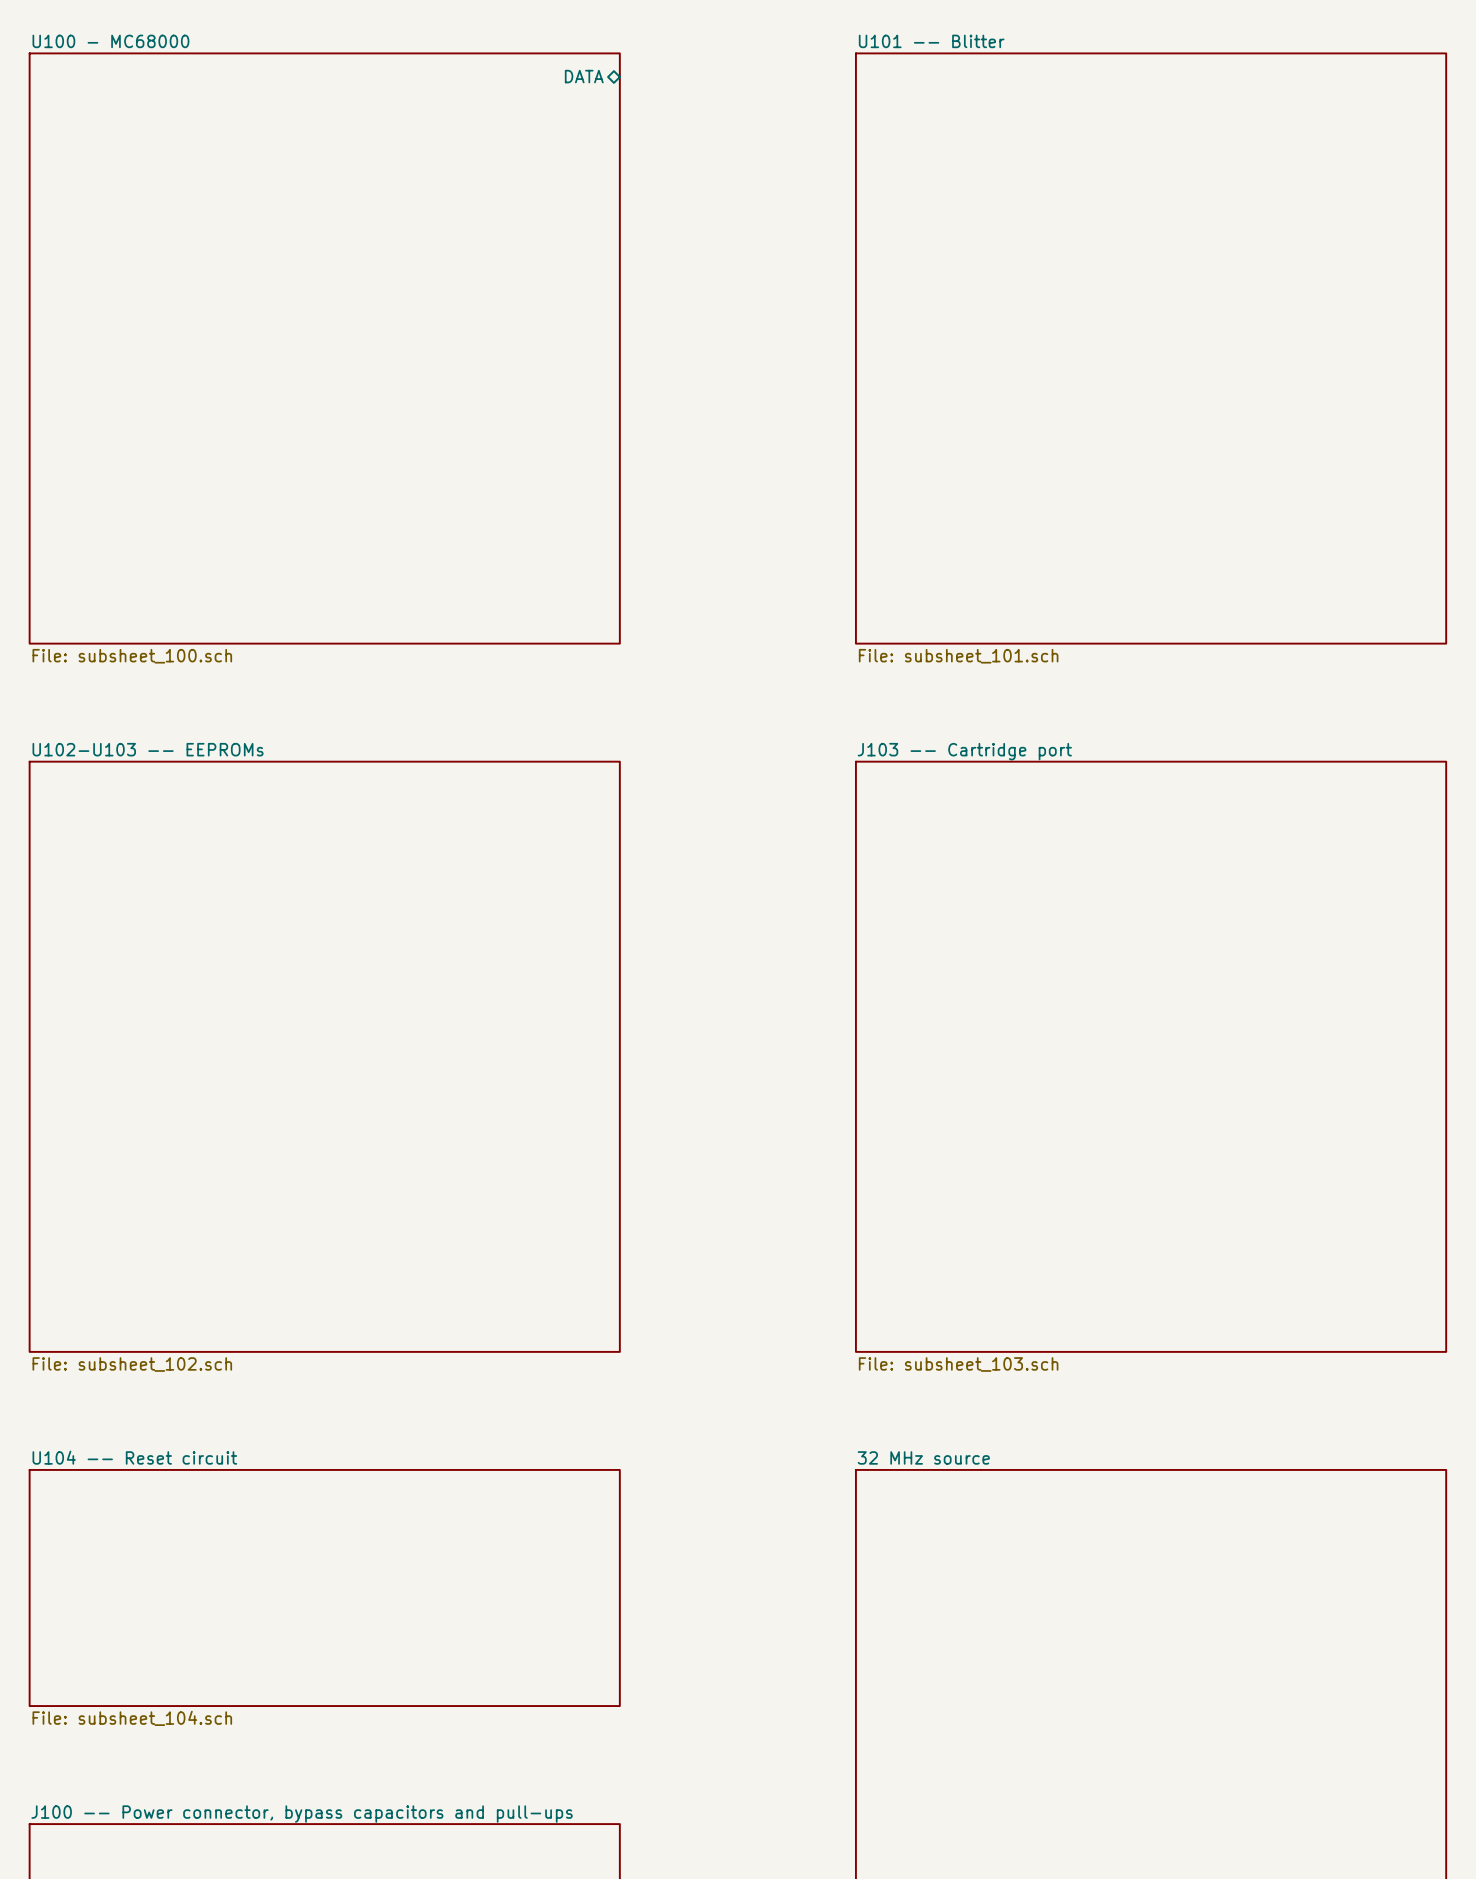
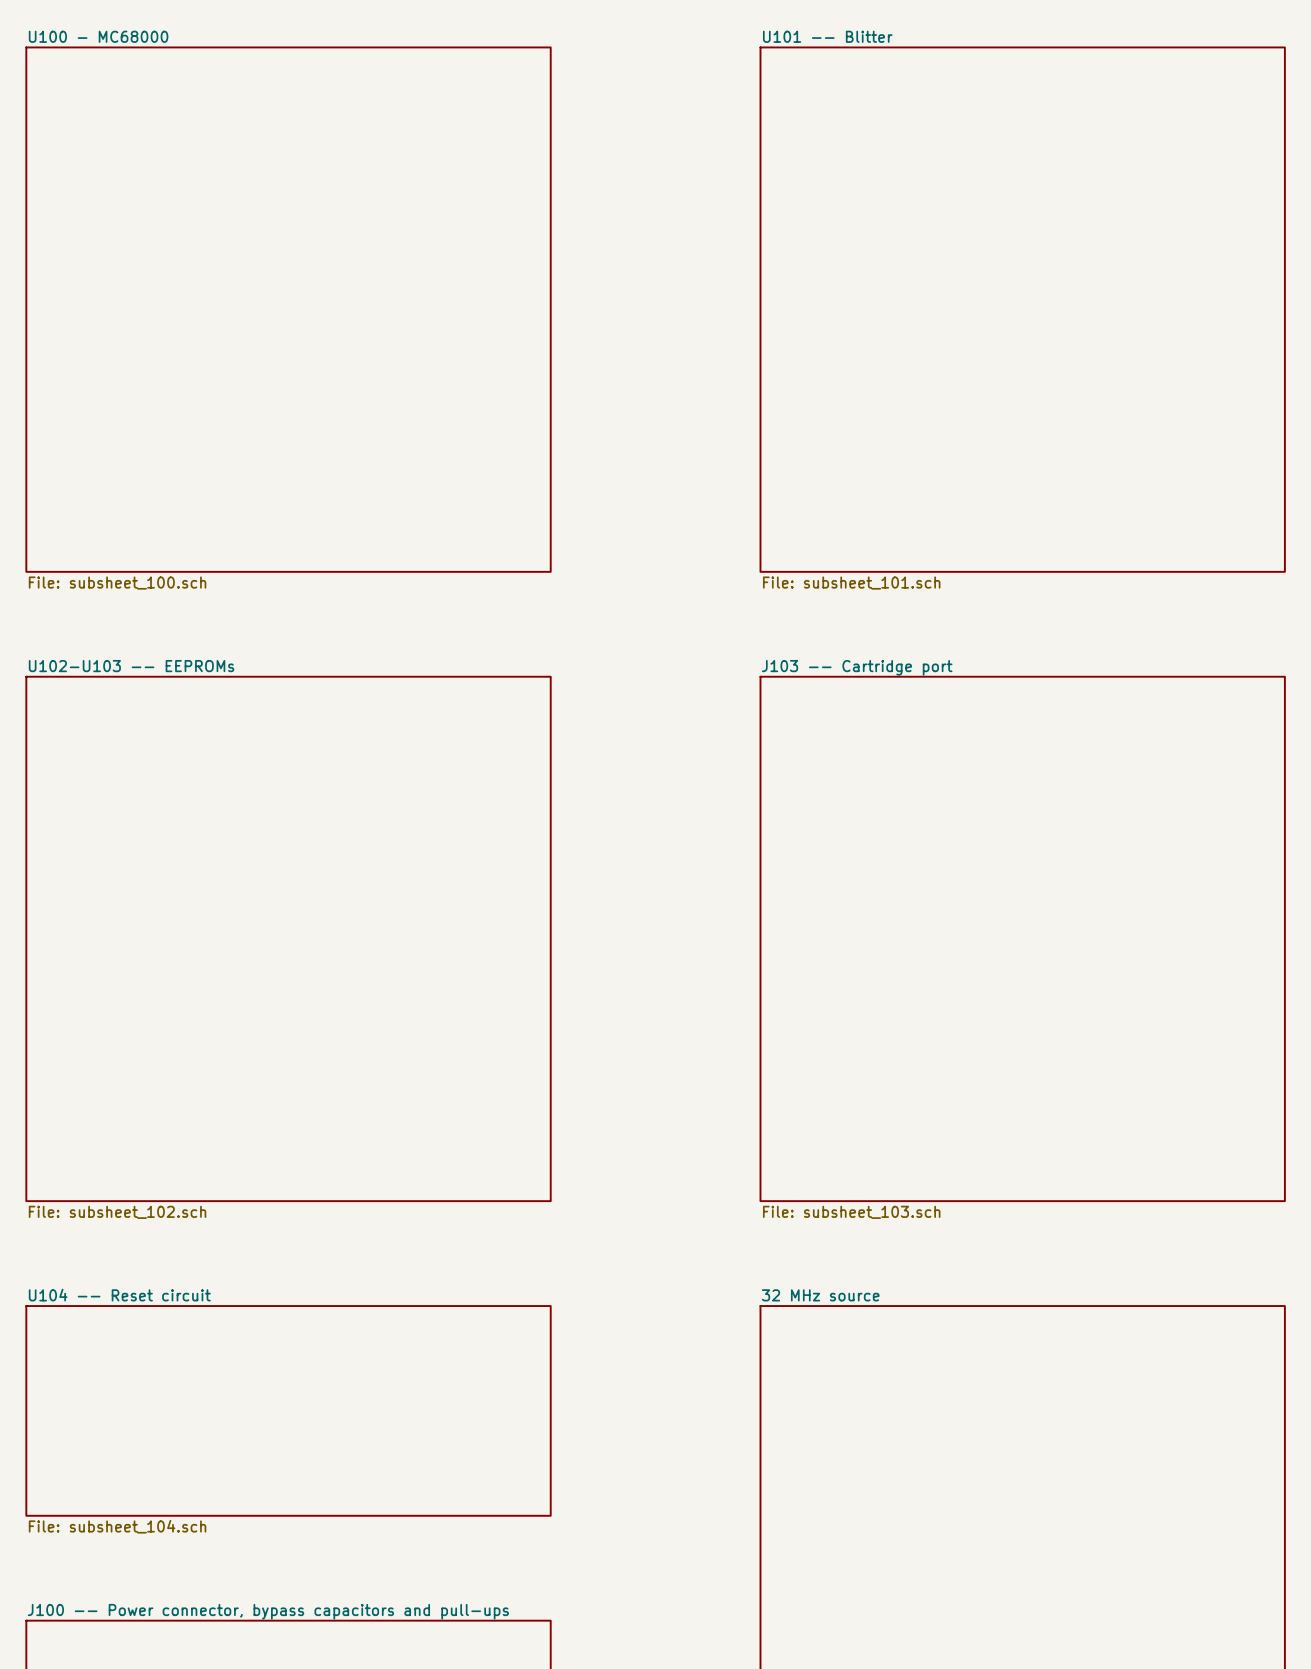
sheet pin: DATA (584, 76) -> none

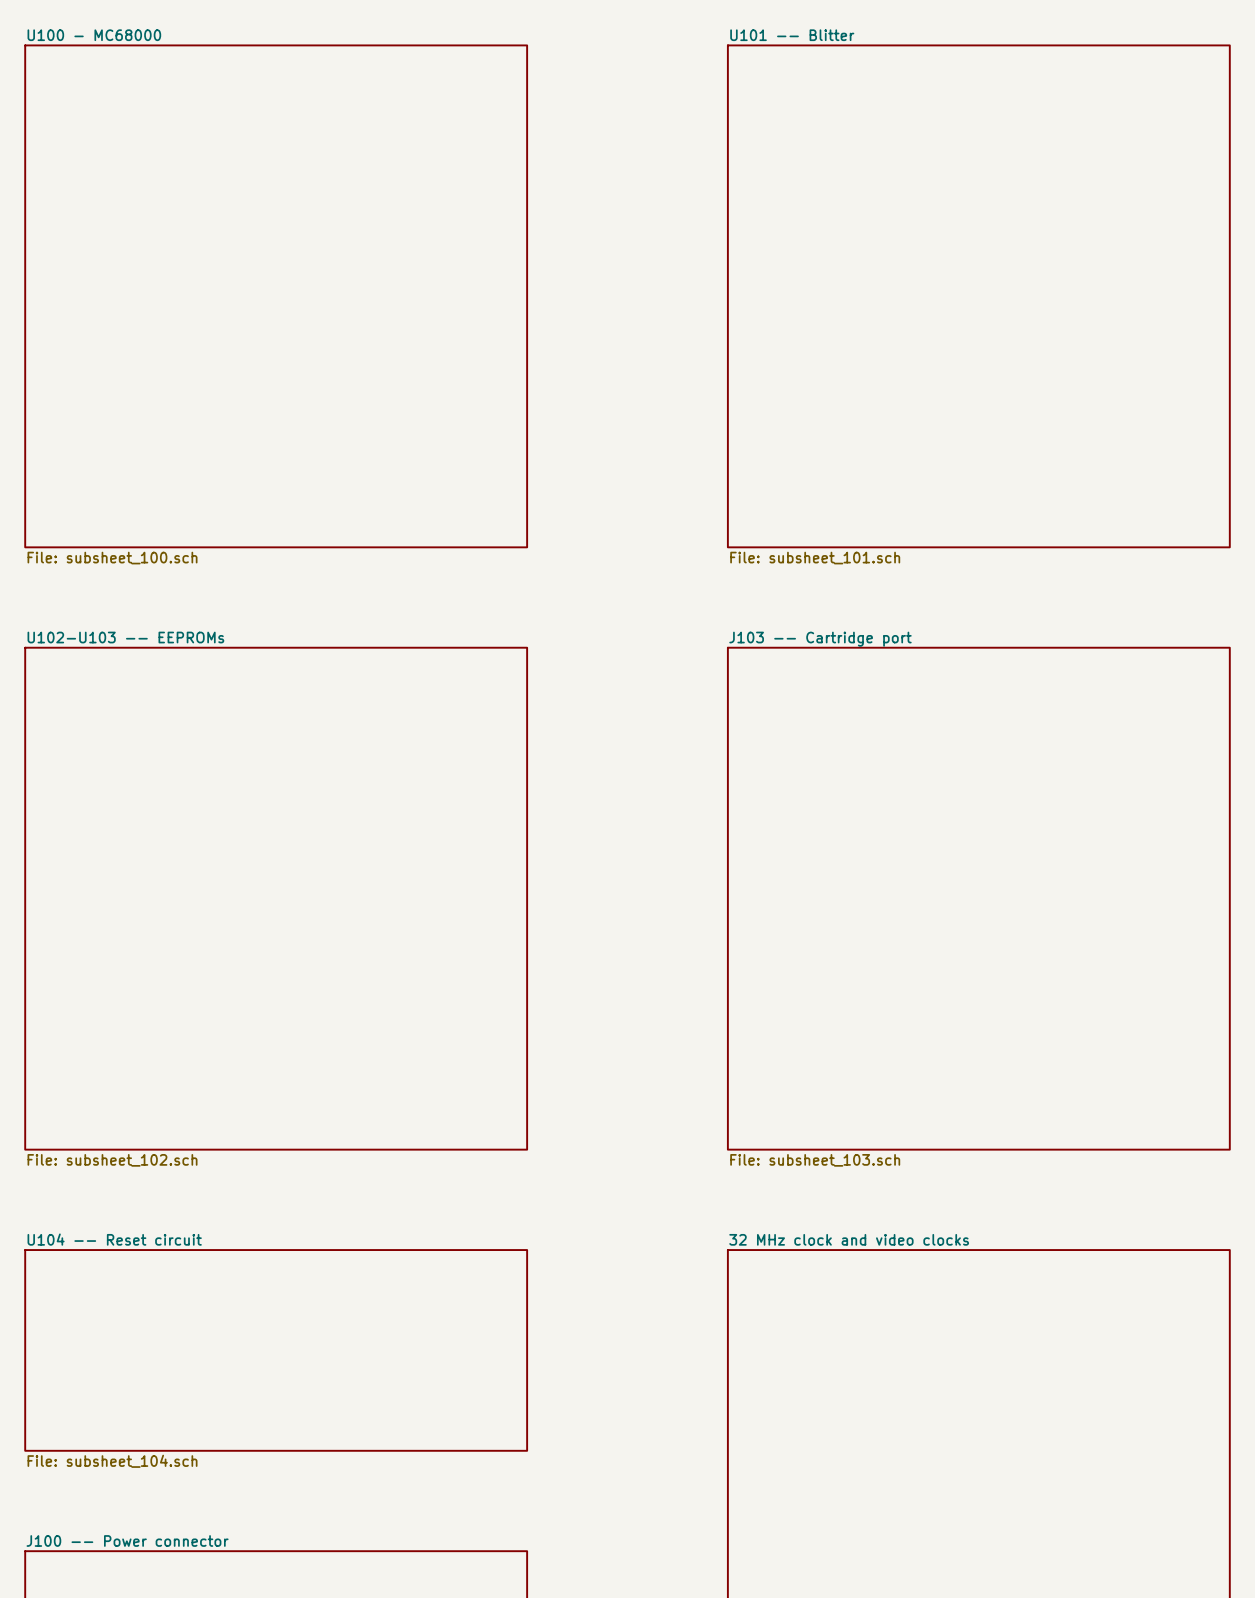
sheet 32 MHz source name: 32 MHz source (820, 1295) -> 32 MHz clock and video clocks (849, 1239)
sheet J100 -- Power connector name: J100 -- Power connector, bypass capacitors and pull-ups (268, 1611) -> J100 -- Power connector (127, 1540)

